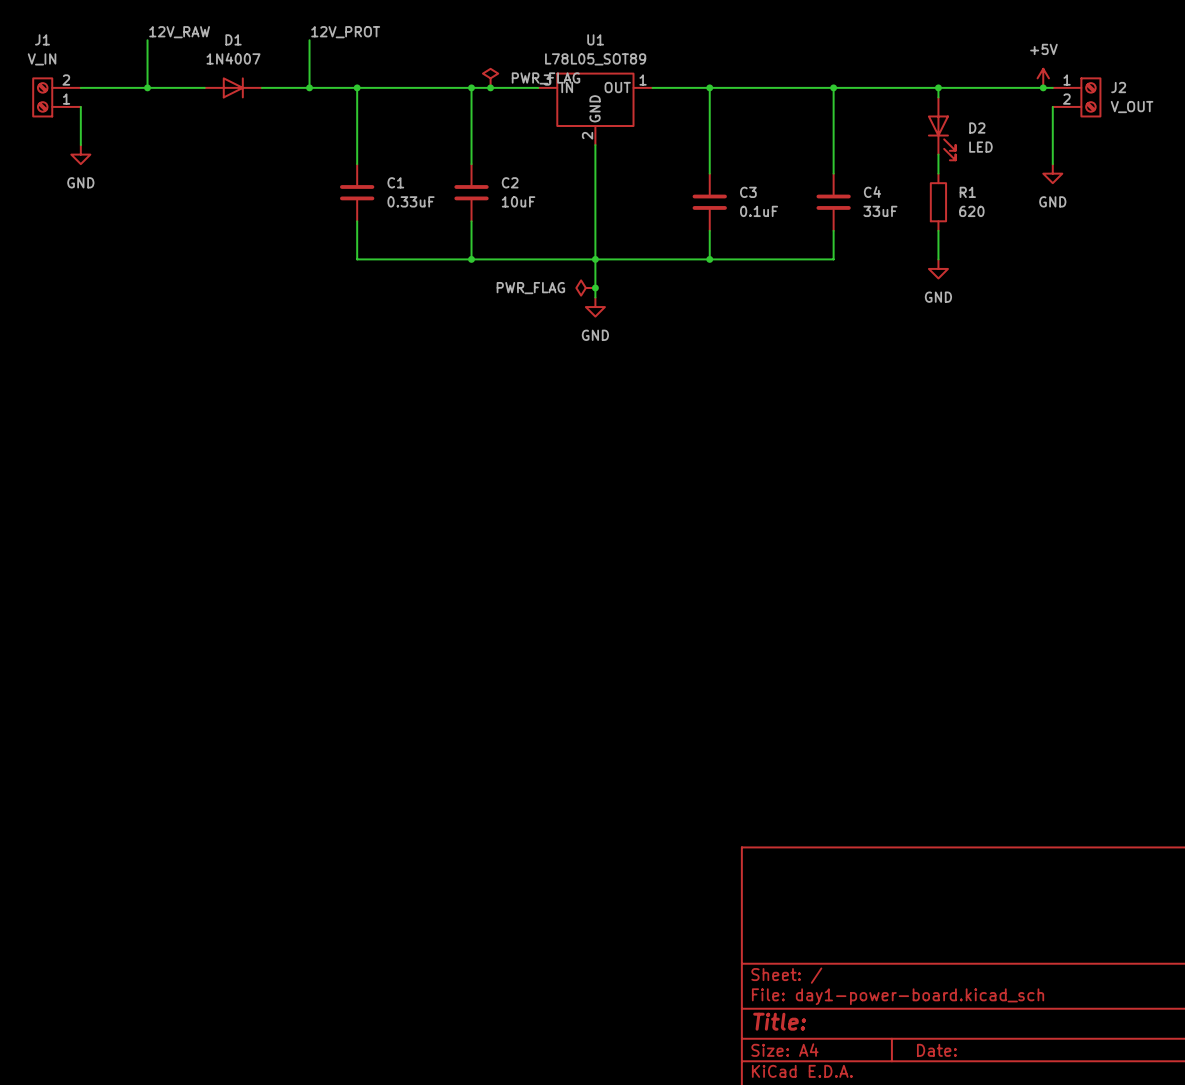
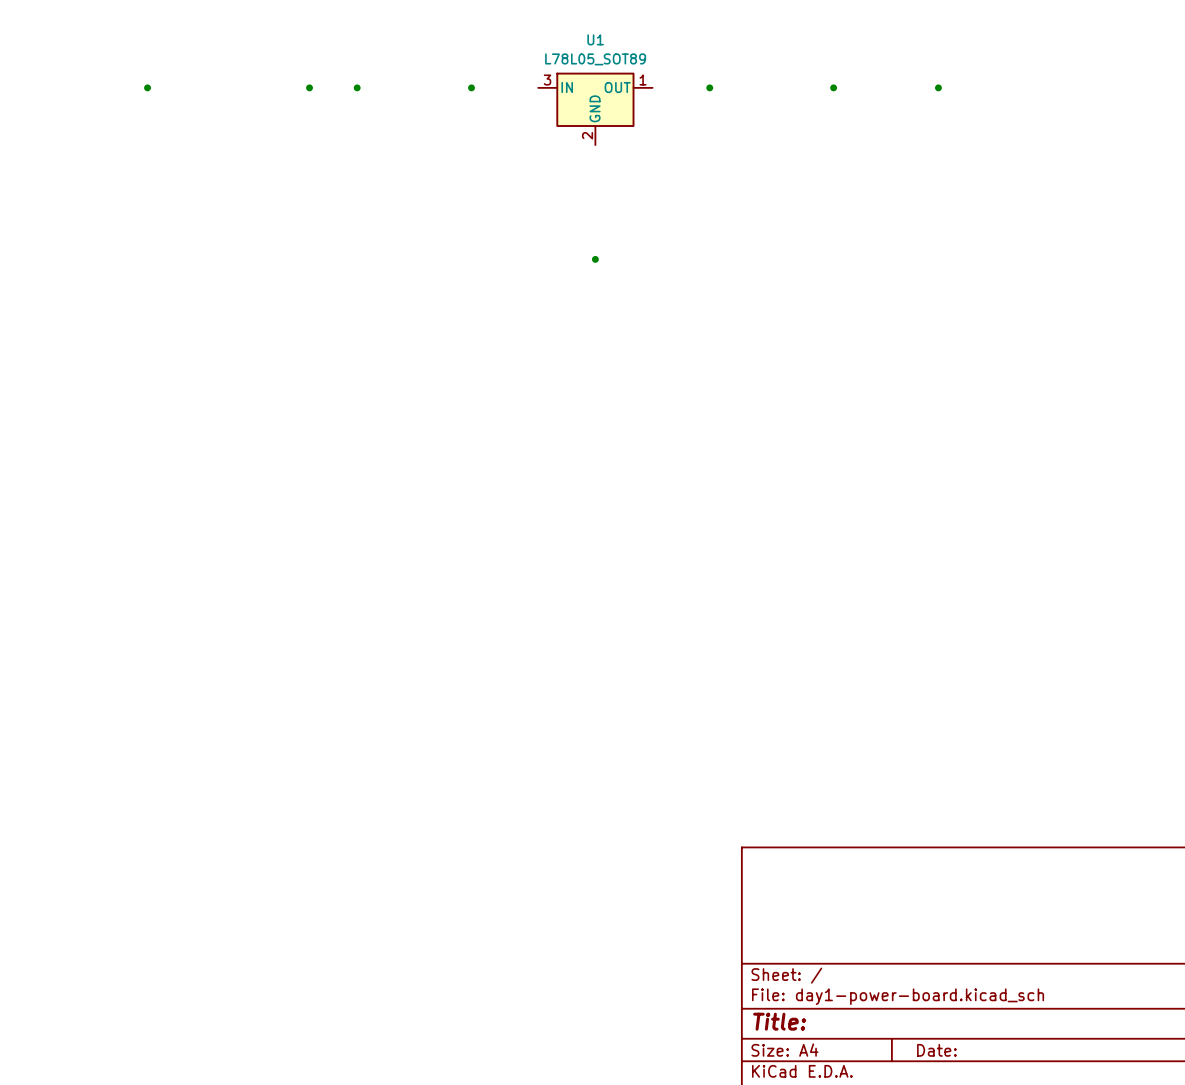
label: 12V_RAW (179, 32) -> none
label: 12V_PROT (345, 32) -> none
wire: (147, 40) (147, 87) -> none
wire: (309, 40) (309, 87) -> none
power symbol: PWR_FLAG (490, 78) -> none
power symbol: +5V (1043, 78) -> none
wire: (80, 87) (204, 87) -> none
D1: 1N4007 (233, 87) -> none
wire: (261, 87) (538, 87) -> none
wire: (357, 87) (357, 164) -> none
wire: (471, 87) (471, 164) -> none
junction: (490, 87) -> none
wire: (652, 87) (1052, 87) -> none
wire: (709, 87) (709, 173) -> none
wire: (833, 87) (833, 173) -> none
wire: (938, 87) (938, 97) -> none
junction: (1043, 87) -> none
J1: V_IN (56, 97) -> none
J2: V_OUT (1077, 97) -> none
wire: (80, 106) (80, 145) -> none
wire: (1052, 106) (1052, 164) -> none
D2: LED (941, 128) -> none
wire: (595, 145) (595, 297) -> none
power symbol: GND (80, 154) -> none
wire: (938, 154) (938, 173) -> none
power symbol: GND (1052, 173) -> none
C1: 0.33uF (357, 192) -> none
C2: 10uF (471, 192) -> none
C3: 0.1uF (709, 202) -> none
C4: 33uF (833, 202) -> none
R1: 620 (938, 202) -> none
wire: (357, 221) (357, 259) (833, 259) (833, 230) -> none
wire: (471, 221) (471, 259) -> none
wire: (709, 230) (709, 259) -> none
wire: (938, 230) (938, 259) -> none
junction: (471, 259) -> none
junction: (709, 259) -> none
power symbol: GND (938, 268) -> none
power symbol: PWR_FLAG (585, 287) -> none
junction: (595, 287) -> none
power symbol: GND (595, 307) -> none

